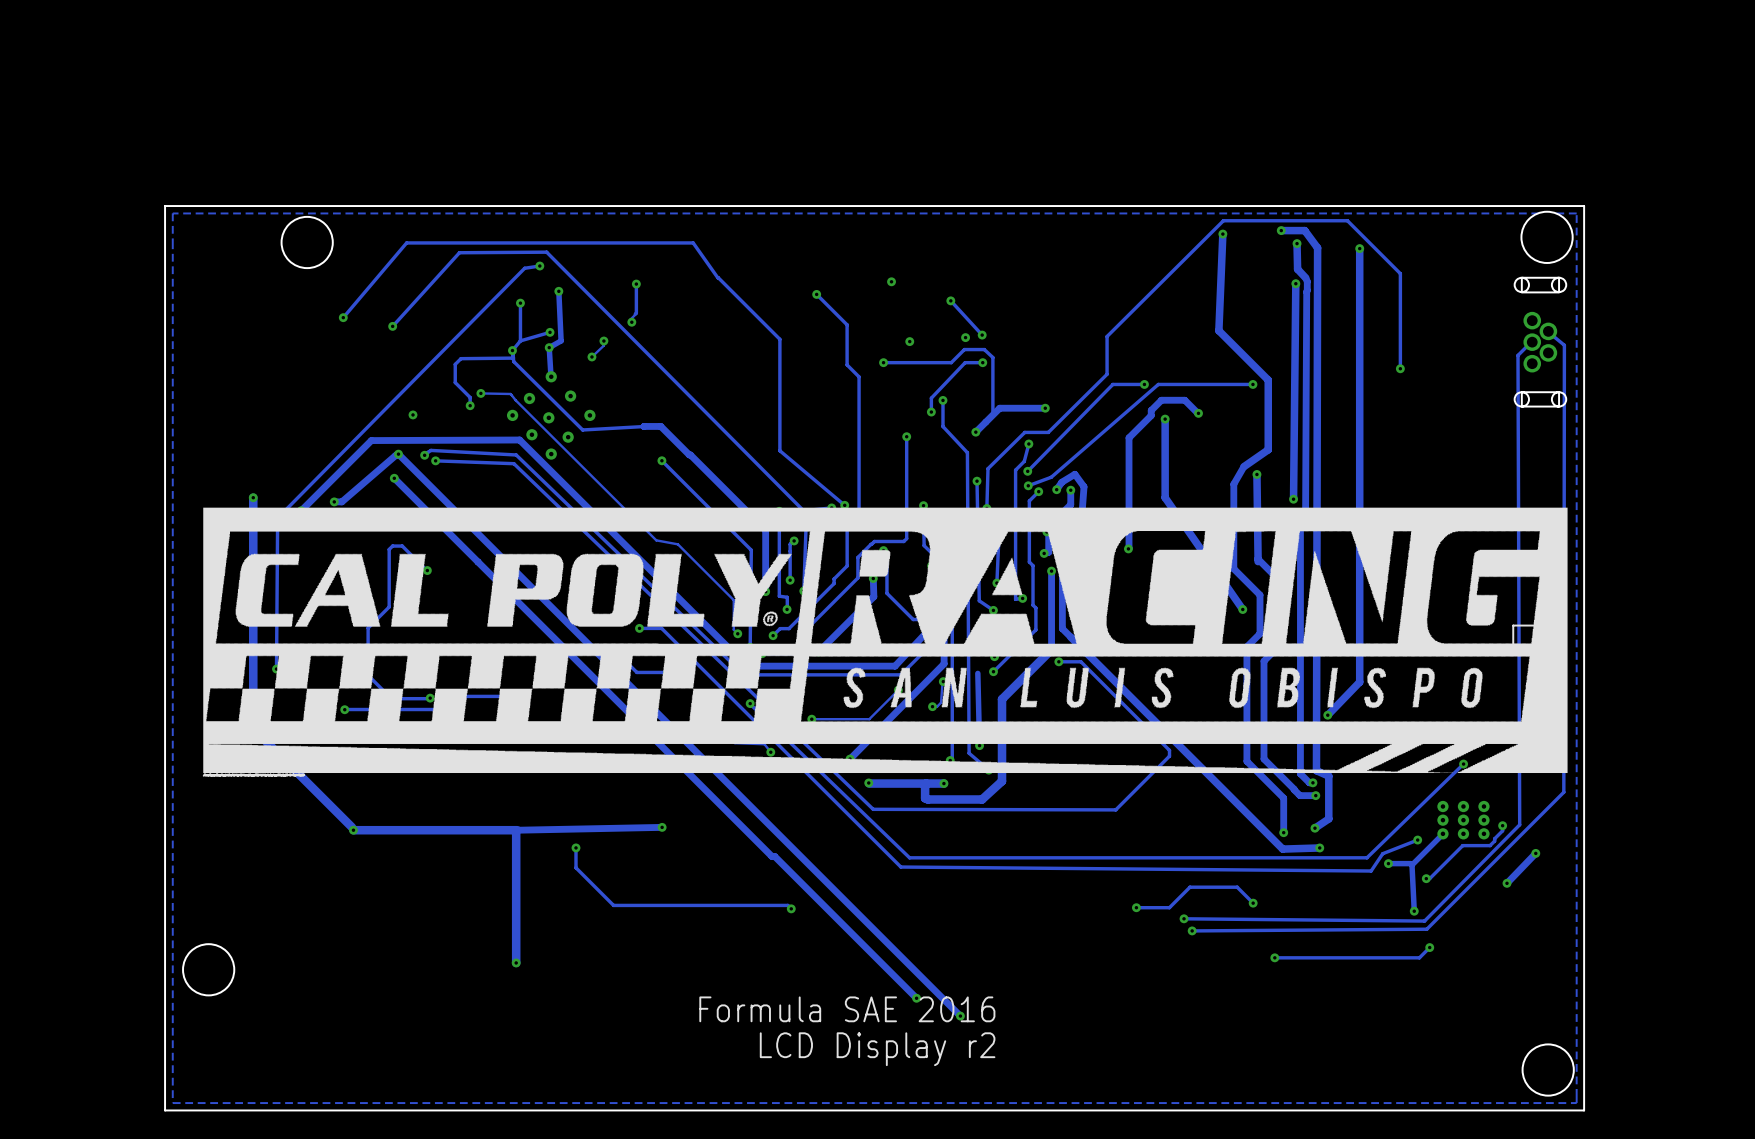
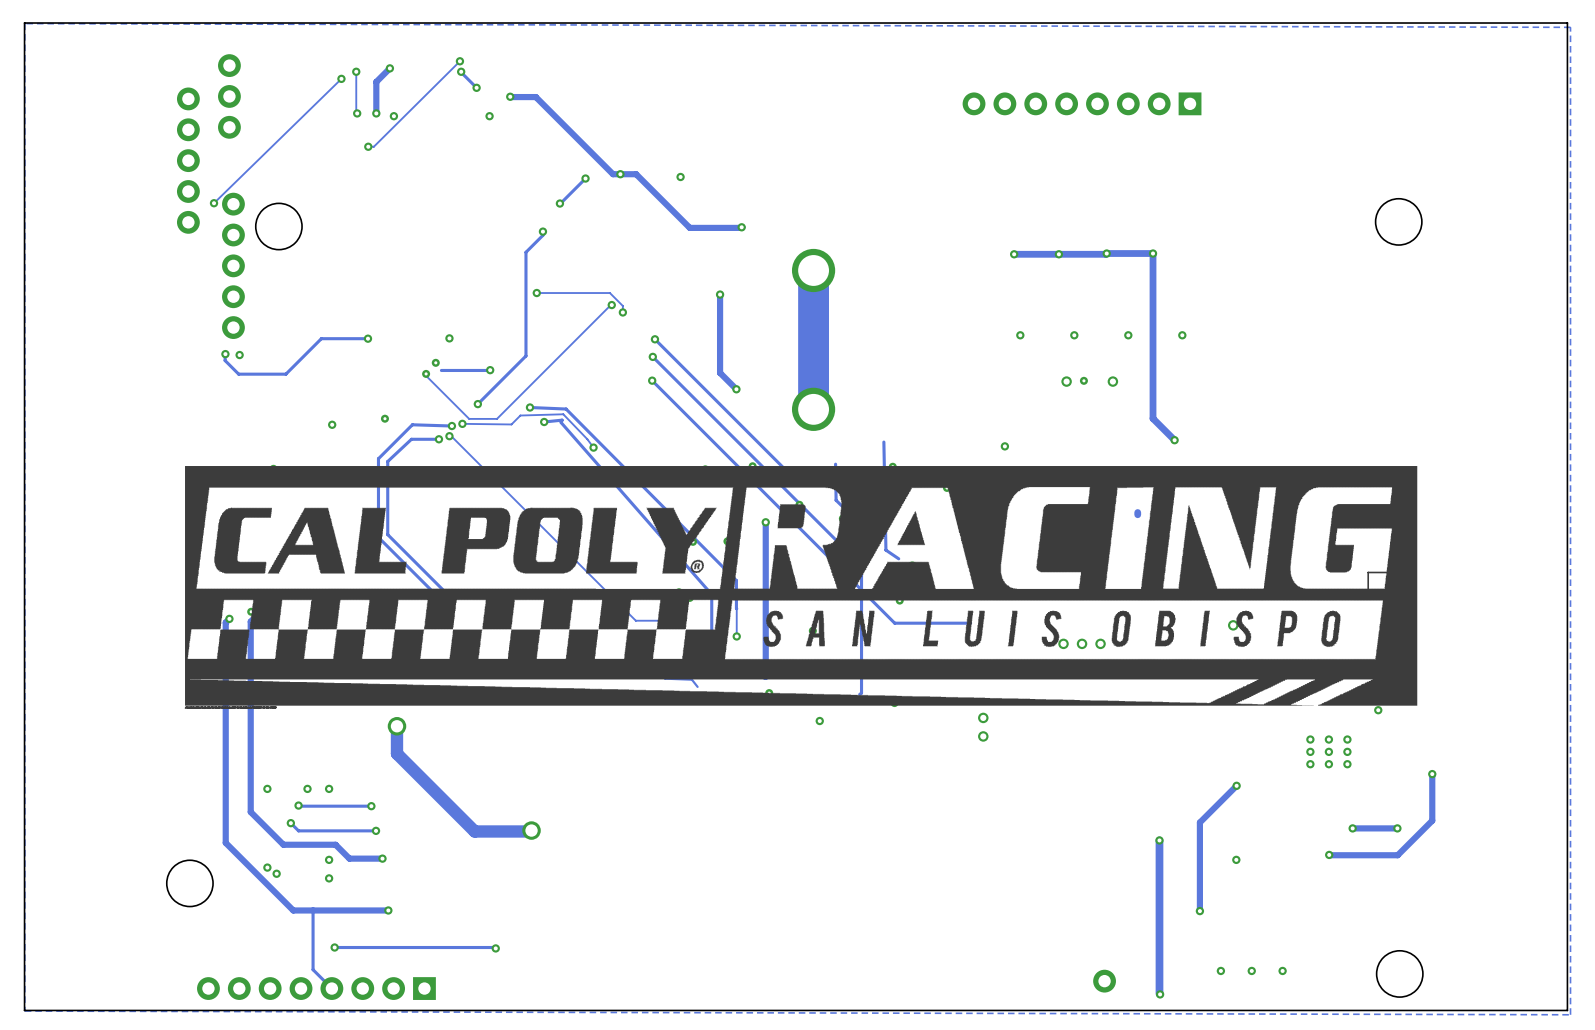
track: none -> (459, 61) (373, 146) (368, 146)
via: none -> (459, 61)
track: none -> (389, 68) (376, 81) (376, 113)
via: none -> (389, 68)
track: none -> (356, 71) (357, 113)
via: none -> (356, 71)
track: none -> (461, 71) (476, 87)
via: none -> (461, 71)
track: none -> (341, 78) (214, 203)
via: none -> (341, 78)
via: none -> (476, 87)
part: none -> (229, 96)
track: none -> (510, 96) (535, 97) (613, 174) (636, 174) (689, 227) (741, 227)
via: none -> (510, 96)
part: none -> (1082, 103)
via: none -> (357, 113)
via: none -> (376, 113)
via: none -> (393, 116)
via: none -> (489, 116)
via: none -> (368, 146)
part: none -> (188, 160)
via: none -> (620, 174)
via: none -> (680, 176)
track: none -> (585, 178) (559, 203)
via: none -> (585, 178)
zone outline: (1576, 213) (172, 213) (172, 1103) (1576, 1103) (1576, 213) -> (24, 23) (1570, 27) (1570, 1014) (24, 1011) (24, 23)
via: none -> (214, 203)
via: none -> (559, 203)
track: (1281, 230) (1304, 230) (1317, 247) (1316, 770) (1328, 776) (1328, 818) (1314, 828) -> none
via: (1281, 230) -> none
track: (1222, 234) (1218, 330) (1268, 380) (1268, 449) (1243, 466) (1233, 484) (1233, 568) (1260, 595) (1260, 633) (1246, 646) (1246, 761) (1283, 798) (1283, 832) -> none
via: (1222, 234) -> none
via: none -> (741, 227)
track: (1297, 243) (1297, 269) (1307, 281) (1305, 516) (1300, 521) (1300, 773) (1309, 782) (1312, 782) -> none
via: (1297, 243) -> none
track: none -> (542, 231) (542, 235) (525, 252) (525, 355) (477, 404)
via: none -> (542, 231)
track: (1359, 248) (1359, 682) (1327, 715) -> none
via: (1359, 248) -> none
track: (539, 266) (524, 268) (277, 518) (276, 669) -> none
via: (539, 266) -> none
via: none -> (1106, 253)
via: none -> (1153, 253)
track: none -> (1014, 254) (1153, 253) (1153, 418) (1174, 440)
via: none -> (1014, 254)
via: none -> (1058, 254)
via size: [887, 277, 896, 287] -> [791, 248, 836, 293]
track: (1295, 283) (1293, 499) -> none
via: (1295, 283) -> none
track: (636, 284) (636, 313) (630, 319) (631, 322) -> none
via: (636, 284) -> none
part: none -> (233, 265)
track: (558, 291) (561, 340) (549, 347) (551, 376) -> none
via: (558, 291) -> none
track: none -> (813, 270) (813, 409)
track: (816, 294) (847, 324) (847, 364) (859, 376) (859, 517) (847, 528) (847, 565) (834, 579) (834, 583) (789, 628) (780, 628) (773, 635) -> none
via: (816, 294) -> none
track: (950, 300) (982, 335) -> none
via: (950, 300) -> none
track: (520, 303) (520, 340) -> none
via: (520, 303) -> none
track: none -> (536, 293) (609, 293) (622, 305) (622, 312)
via: none -> (536, 293)
track: (343, 317) (406, 242) (693, 242) (717, 277) (779, 339) (779, 450) (844, 505) -> none
via: (343, 317) -> none
track: none -> (720, 294) (720, 372) (736, 389)
via: none -> (720, 294)
via: (631, 322) -> none
track: (392, 326) (459, 252) (546, 252) (803, 510) (831, 507) -> none
via: (392, 326) -> none
track: none -> (611, 305) (496, 418) (469, 418) (425, 375)
via: none -> (611, 305)
track: (1548, 331) (1564, 345) (1563, 792) (1426, 929) (1192, 930) -> none
track: (550, 332) (520, 340) -> none
via: (550, 332) -> none
via: (982, 335) -> none
via: none -> (622, 312)
via: (965, 337) -> none
track: (520, 340) (512, 350) -> none
track: (603, 341) (603, 345) (591, 356) -> none
via: (603, 341) -> none
via: (909, 341) -> none
track: (1532, 342) (1517, 355) (1519, 824) (1424, 921) (1184, 918) -> none
part: (1540, 342) -> none
via: (549, 347) -> none
track: (512, 350) (513, 361) (582, 429) (643, 426) -> none
track: (512, 350) (513, 358) (460, 358) (455, 364) (455, 382) (470, 397) (470, 405) -> none
via: (512, 350) -> none
via: (591, 356) -> none
track: (883, 362) (951, 362) (964, 349) (984, 349) (992, 357) (992, 415) (985, 422) -> none
via: (883, 362) -> none
track: (982, 362) (965, 362) (931, 398) (931, 412) -> none
via: (982, 362) -> none
via: none -> (1020, 335)
via: none -> (1074, 335)
via: none -> (1128, 335)
via: none -> (1182, 335)
track: none -> (367, 338) (321, 338) (285, 374) (238, 374) (225, 360) (225, 354)
via: none -> (367, 338)
via: none -> (449, 338)
track: none -> (654, 339) (791, 475) (959, 475)
via: none -> (654, 339)
track: (1400, 368) (1400, 273) (1347, 220) (1223, 220) (1107, 336) (1107, 374) (1048, 432) (1024, 432) (988, 468) (986, 508) -> none
via: (1400, 368) -> none
via: none -> (225, 354)
via: none -> (239, 355)
track: (1144, 384) (1112, 384) (1027, 471) -> none
via: (1144, 384) -> none
track: (1252, 384) (1158, 384) (1051, 477) (1028, 485) -> none
via: (1252, 384) -> none
track: none -> (652, 356) (846, 550)
via: none -> (652, 356)
track: (480, 393) (510, 393) (656, 540) (677, 544) (733, 600) (733, 629) (737, 633) -> none
track: (942, 400) (942, 426) (967, 452) (969, 753) (988, 770) -> none
via: (942, 400) -> none
track: none -> (490, 370) (441, 370)
via: none -> (490, 370)
track: (1045, 408) (999, 408) (975, 432) -> none
via: (1045, 408) -> none
via: (931, 412) -> none
track: none -> (652, 380) (894, 623) (970, 623)
via: none -> (652, 380)
track: (1198, 413) (1184, 400) (1161, 400) (1151, 410) (1151, 415) (1129, 437) (1128, 548) -> none
via: (413, 414) -> none
via: none -> (1066, 381)
via: none -> (1112, 381)
part: (551, 415) -> none
track: (1165, 419) (1165, 497) (1242, 609) -> none
via: (1165, 419) -> none
via: none -> (736, 389)
track: (643, 426) (660, 426) (765, 530) (765, 591) -> none
via size: [902, 432, 912, 442] -> [791, 387, 836, 431]
via: (975, 432) -> none
track: (906, 436) (906, 538) (903, 541) (874, 541) (857, 557) (857, 577) (799, 636) (799, 653) (762, 653) -> none
via: none -> (477, 404)
track: none -> (529, 407) (566, 409) (736, 580) (736, 636)
via: none -> (529, 407)
track: (1028, 443) (1024, 461) (1015, 470) (1015, 599) (1022, 598) -> none
via: (1028, 443) -> none
via: (398, 454) -> none
track: (424, 455) (430, 450) (516, 454) (744, 674) (900, 674) (932, 642) -> none
track: none -> (544, 422) (562, 420) (561, 422) (711, 594) (711, 650)
via: none -> (544, 422)
track: (435, 460) (513, 463) (873, 809) (1115, 809) (1169, 756) (1169, 750) (1080, 661) (1058, 661) -> none
via: (435, 460) -> none
track: none -> (462, 423) (511, 424) (520, 415) (563, 414) (593, 447)
via: none -> (462, 423)
track: (661, 460) (751, 550) (750, 647) -> none
via: (661, 460) -> none
via: none -> (332, 424)
track: none -> (451, 426) (412, 424) (378, 458) (378, 537) (432, 591)
via: none -> (451, 426)
via: (1027, 471) -> none
track: none -> (449, 436) (635, 620) (672, 620)
via: none -> (449, 436)
track: (1256, 474) (1258, 559) (1282, 583) (1282, 642) (1263, 661) (1263, 759) (1299, 795) (1315, 795) -> none
via: (1256, 474) -> none
track: (394, 478) (771, 856) (774, 856) (916, 998) -> none
via: (394, 478) -> none
track: none -> (438, 439) (411, 439) (387, 461) (387, 534) (452, 599)
via: none -> (438, 439)
via: none -> (1174, 440)
via: (977, 481) -> none
via: (1028, 485) -> none
via: none -> (1004, 446)
via: none -> (593, 447)
track: (1056, 489) (1061, 482) (1074, 474) (1084, 486) (1080, 540) -> none
via: (1056, 489) -> none
track: (1070, 490) (1070, 504) (1062, 513) (1062, 628) (1282, 849) (1319, 847) -> none
via: (1070, 490) -> none
track: (1038, 491) (1029, 501) (1029, 562) (1033, 565) (1033, 605) (1035, 608) (1035, 629) (993, 671) -> none
via: (1038, 491) -> none
track: (253, 497) (253, 728) (353, 830) (517, 830) -> none
via: (253, 497) -> none
via: (1293, 499) -> none
track: (334, 501) (341, 501) (398, 454) (960, 1016) -> none
via: (334, 501) -> none
via: (844, 505) -> none
via: (923, 505) -> none
track: (301, 510) (371, 440) (519, 440) (746, 666) (895, 666) (927, 631) (939, 631) -> none
track: (779, 511) (779, 596) (787, 597) (787, 609) -> none
track: (801, 523) (806, 525) (803, 591) -> none
track: (999, 531) (996, 583) -> none
track: (1046, 531) (1048, 534) (1048, 552) (1044, 553) -> none
track: (794, 540) (790, 544) (790, 580) -> none
via: (794, 540) -> none
via: (1128, 548) -> none
track: (883, 550) (886, 554) (886, 593) (913, 619) (926, 619) -> none
via: (1044, 553) -> none
track: none -> (765, 522) (765, 676)
via: none -> (765, 522)
track: (427, 570) (402, 546) (392, 546) (389, 549) (389, 606) (368, 628) (368, 675) (391, 698) (430, 698) -> none
via: (427, 570) -> none
track: (1051, 571) (1051, 649) (1002, 699) (1002, 781) (982, 799) (927, 799) (925, 798) (926, 783) -> none
via: (1051, 571) -> none
track: (873, 578) (873, 596) (818, 651) -> none
via: (873, 578) -> none
via: (790, 580) -> none
via: (996, 583) -> none
via: (1022, 598) -> none
via: (787, 609) -> none
via: (1242, 609) -> none
via: (993, 610) -> none
track: (639, 628) (661, 628) (900, 867) (1371, 871) (1382, 853) (1417, 840) -> none
via: (639, 628) -> none
track: (939, 631) (944, 632) (944, 663) (850, 759) -> none
via: (737, 633) -> none
via: (773, 635) -> none
track: (620, 656) (636, 672) (667, 672) -> none
via: (1058, 661) -> none
via: (993, 671) -> none
track: (977, 673) (979, 745) -> none
track: none -> (229, 618) (225, 622) (225, 842) (293, 910) (388, 910)
via: none -> (229, 618)
track: none -> (252, 619) (250, 621) (250, 812) (283, 844) (335, 844) (349, 858) (382, 858)
track: (943, 681) (942, 679) (941, 702) (937, 706) (932, 706) -> none
via: (943, 681) -> none
via: none -> (1233, 625)
track: (898, 690) (869, 719) (811, 719) -> none
track: (514, 696) (466, 696) (452, 709) (344, 709) -> none
via: none -> (736, 636)
via: (430, 698) -> none
track: (750, 703) (909, 857) (1366, 857) (1463, 764) -> none
via: (750, 703) -> none
via: none -> (1063, 643)
via: none -> (1082, 643)
via: none -> (1100, 643)
via: (932, 706) -> none
via: (344, 709) -> none
via: (1327, 715) -> none
via: (811, 719) -> none
via: (979, 745) -> none
via: (770, 752) -> none
via: (950, 760) -> none
via: (1463, 764) -> none
via: none -> (1378, 710)
track: (868, 782) (943, 783) -> none
via: (868, 782) -> none
via: (1312, 782) -> none
via: (943, 783) -> none
via: none -> (983, 717)
via: none -> (819, 721)
track: none -> (396, 726) (396, 753) (474, 831) (531, 830)
via: none -> (396, 726)
via: (1315, 795) -> none
part footprint: [1437, 800, 1490, 840] -> [1306, 735, 1352, 769]
via: none -> (983, 736)
track: (1502, 825) (1502, 830) (1490, 845) (1462, 845) (1429, 878) (1426, 878) -> none
via: (1502, 825) -> none
track: (662, 827) (517, 830) -> none
via: (662, 827) -> none
via: (1314, 828) -> none
via: (353, 830) -> none
track: (517, 830) (516, 962) -> none
via: (1283, 832) -> none
track: (1442, 833) (1411, 865) -> none
via: (1417, 840) -> none
track: (576, 847) (576, 867) (613, 905) (787, 905) (791, 908) -> none
via: (576, 847) -> none
via: (1319, 847) -> none
track: none -> (1432, 774) (1432, 820) (1397, 855) (1329, 854)
via: none -> (1432, 774)
track: (1535, 853) (1506, 883) -> none
via: (1535, 853) -> none
track: none -> (1236, 785) (1199, 822) (1199, 911)
via: none -> (1236, 785)
track: (1388, 863) (1411, 865) -> none
via: (1388, 863) -> none
via: none -> (267, 788)
via: none -> (307, 788)
via: none -> (329, 788)
track: (1411, 865) (1414, 911) -> none
via: (1426, 878) -> none
track: none -> (298, 805) (371, 806)
via: none -> (298, 805)
via: (1506, 883) -> none
via: none -> (371, 806)
track: none -> (290, 823) (298, 830) (376, 830)
via: none -> (290, 823)
track: (1253, 903) (1237, 887) (1189, 887) (1169, 907) (1136, 907) -> none
via: (1253, 903) -> none
via: (1136, 907) -> none
via: (791, 908) -> none
via: none -> (1352, 828)
track: none -> (1397, 828) (1352, 828)
via: none -> (1397, 828)
via: none -> (376, 830)
via: none -> (531, 830)
via: (1414, 911) -> none
via: (1184, 918) -> none
track: none -> (1159, 840) (1160, 994)
via: none -> (1159, 840)
via: (1192, 930) -> none
via: none -> (1329, 854)
via: none -> (382, 858)
via: none -> (329, 859)
via: none -> (1236, 859)
track: (1429, 947) (1419, 957) (1274, 957) -> none
via: (1429, 947) -> none
via: none -> (267, 867)
via: (1274, 957) -> none
via: none -> (276, 873)
via: (516, 962) -> none
via: none -> (329, 878)
via: (916, 998) -> none
track: none -> (313, 910) (313, 969) (331, 988)
via: none -> (388, 910)
via: none -> (1199, 911)
text: Formula SAE 2016 (847, 1009) -> none
via: (960, 1016) -> none
track: none -> (334, 947) (495, 948)
via: none -> (334, 947)
via: none -> (495, 948)
text: LCD Display r2 (877, 1049) -> none
via: none -> (1220, 970)
via: none -> (1251, 970)
via: none -> (1282, 970)
part: none -> (1104, 981)
part: none -> (316, 988)
via: none -> (1160, 994)
board edge: (1584, 1110) (1584, 206) (165, 206) (165, 1110) -> (1432, 1010) (1567, 1010) (1567, 23) (24, 23) (24, 1010) (150, 1010)

